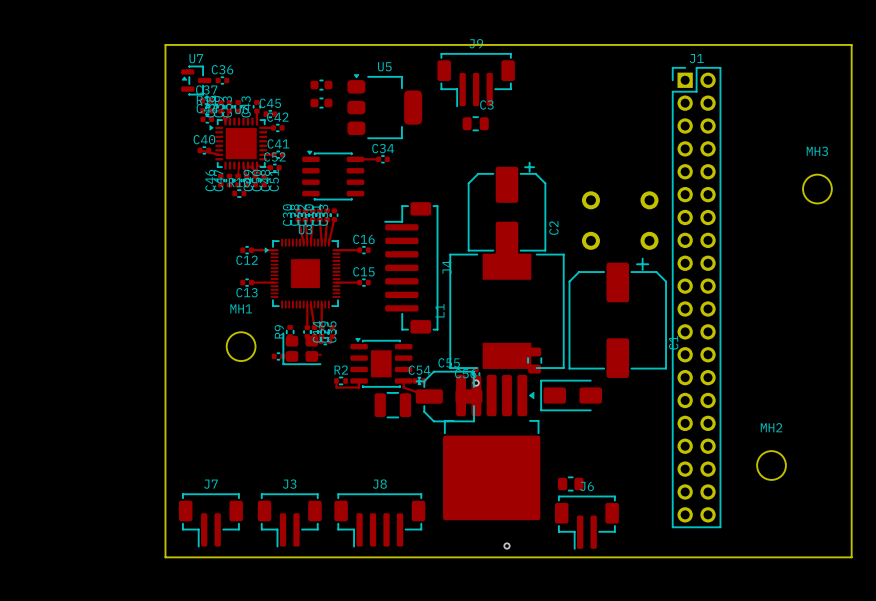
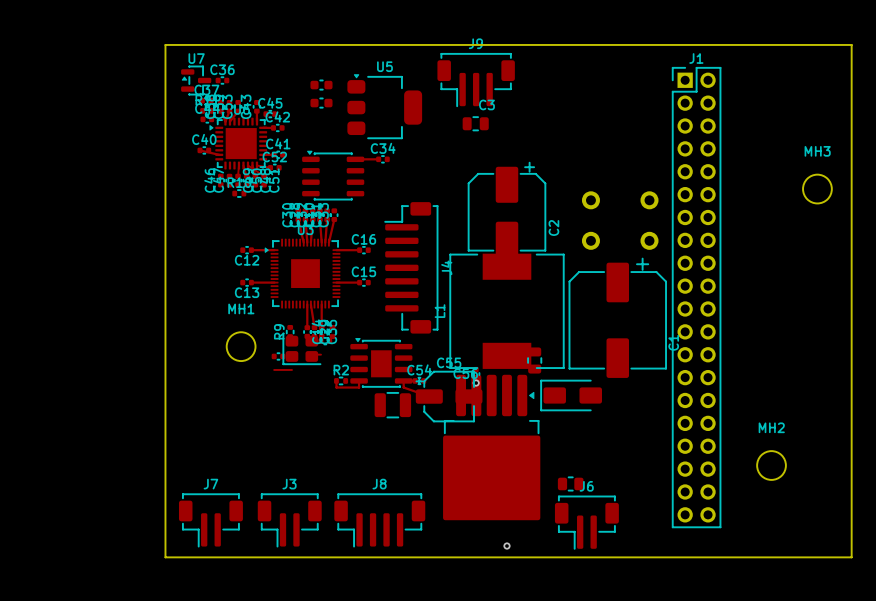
top track: none -> (238, 111) (229, 121)
top track: none -> (274, 369) (291, 369)

